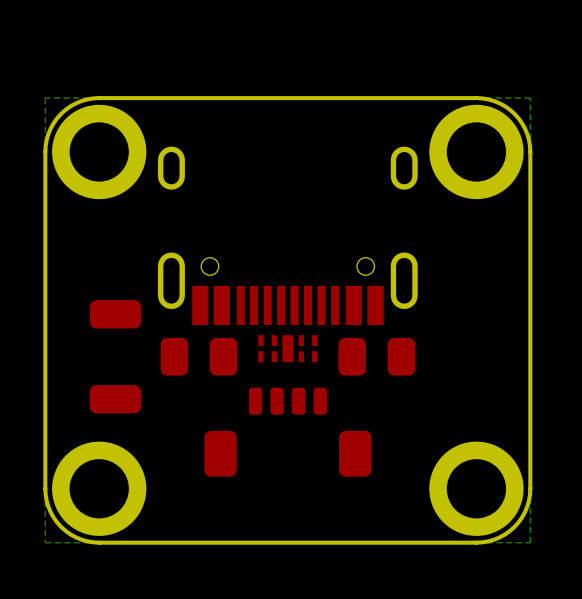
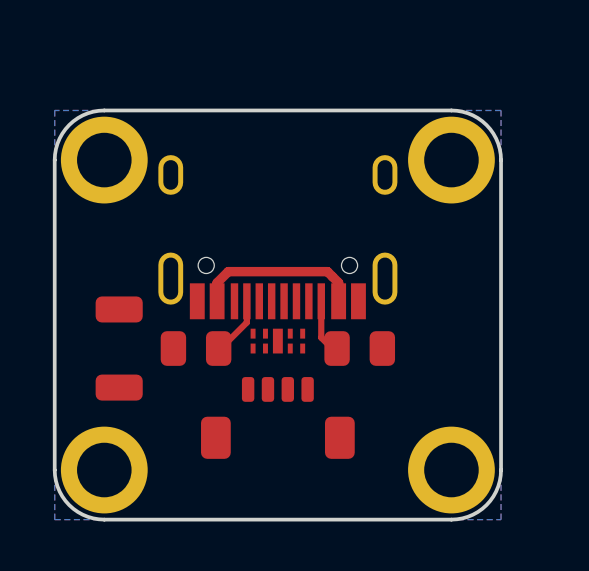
top track: none -> (246, 301) (246, 322) (223, 345) (223, 348)
top track: none -> (321, 301) (321, 337) (332, 348)
top track: none -> (338, 301) (338, 282) (327, 271) (228, 271) (217, 282) (217, 301)

